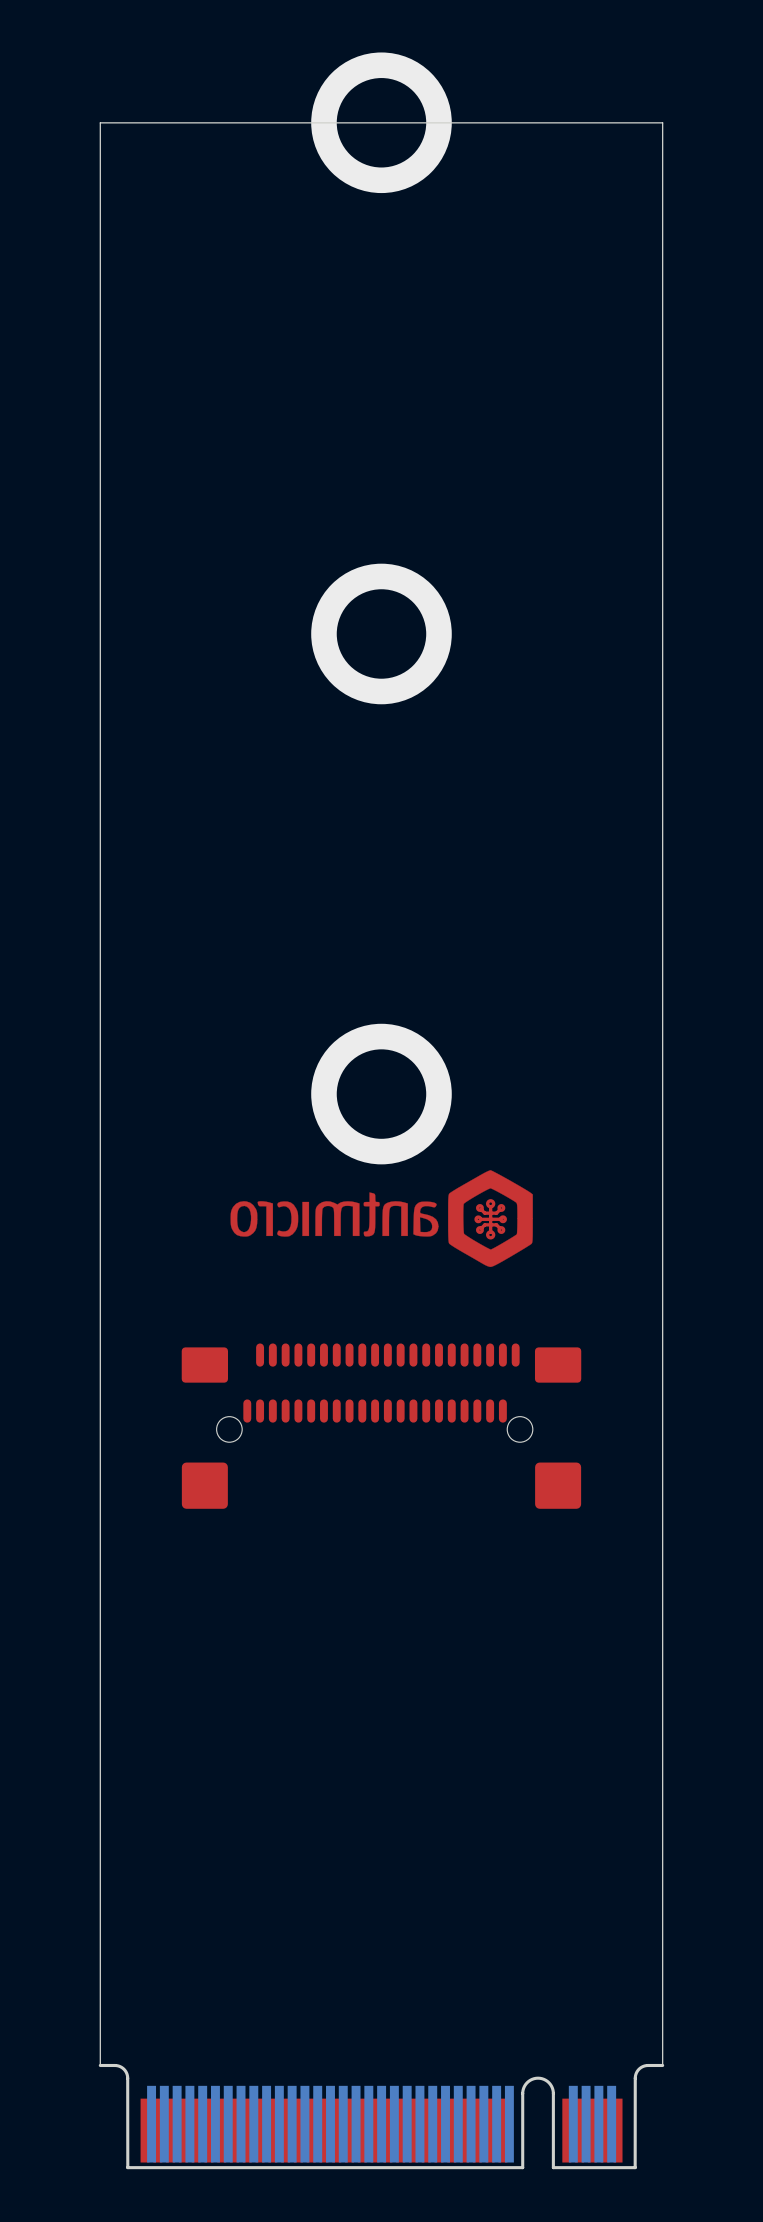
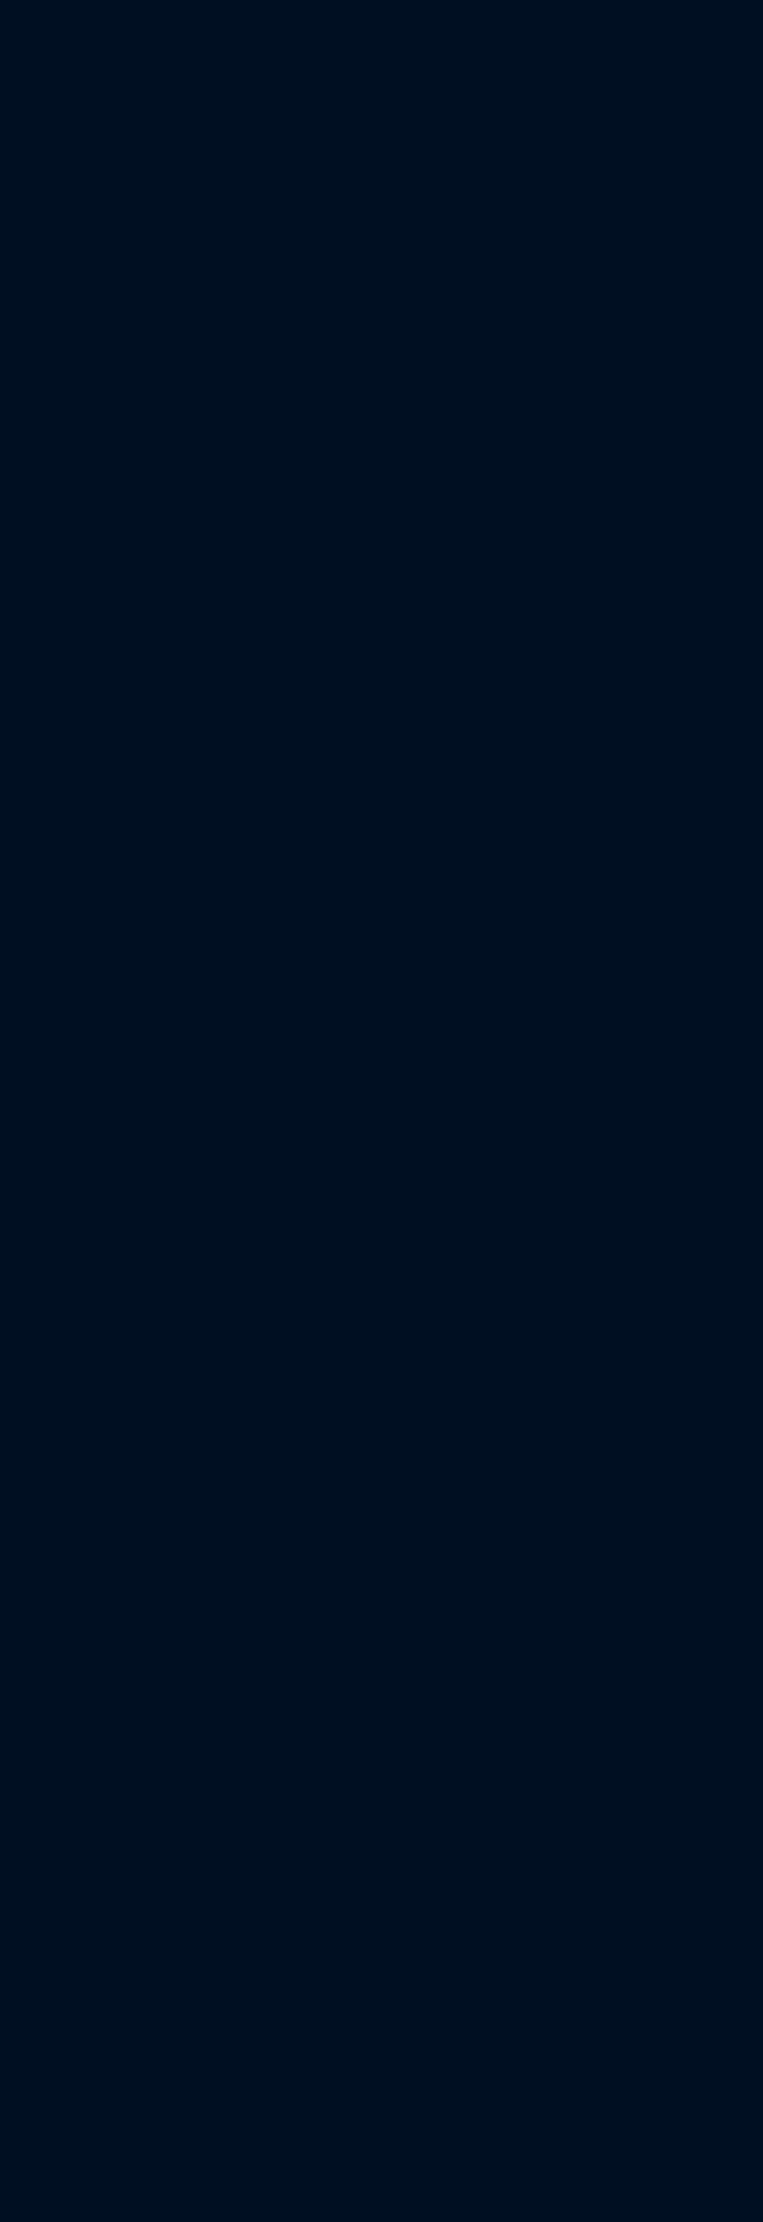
via: (381, 122) -> none
via: (381, 633) -> none
via: (381, 1094) -> none
drawing: [230, 1170, 533, 1268] -> none
part: (381, 1426) -> none
board edge: (662, 2065) (662, 122) (100, 122) (100, 2065) -> none
part: (381, 2116) -> none

